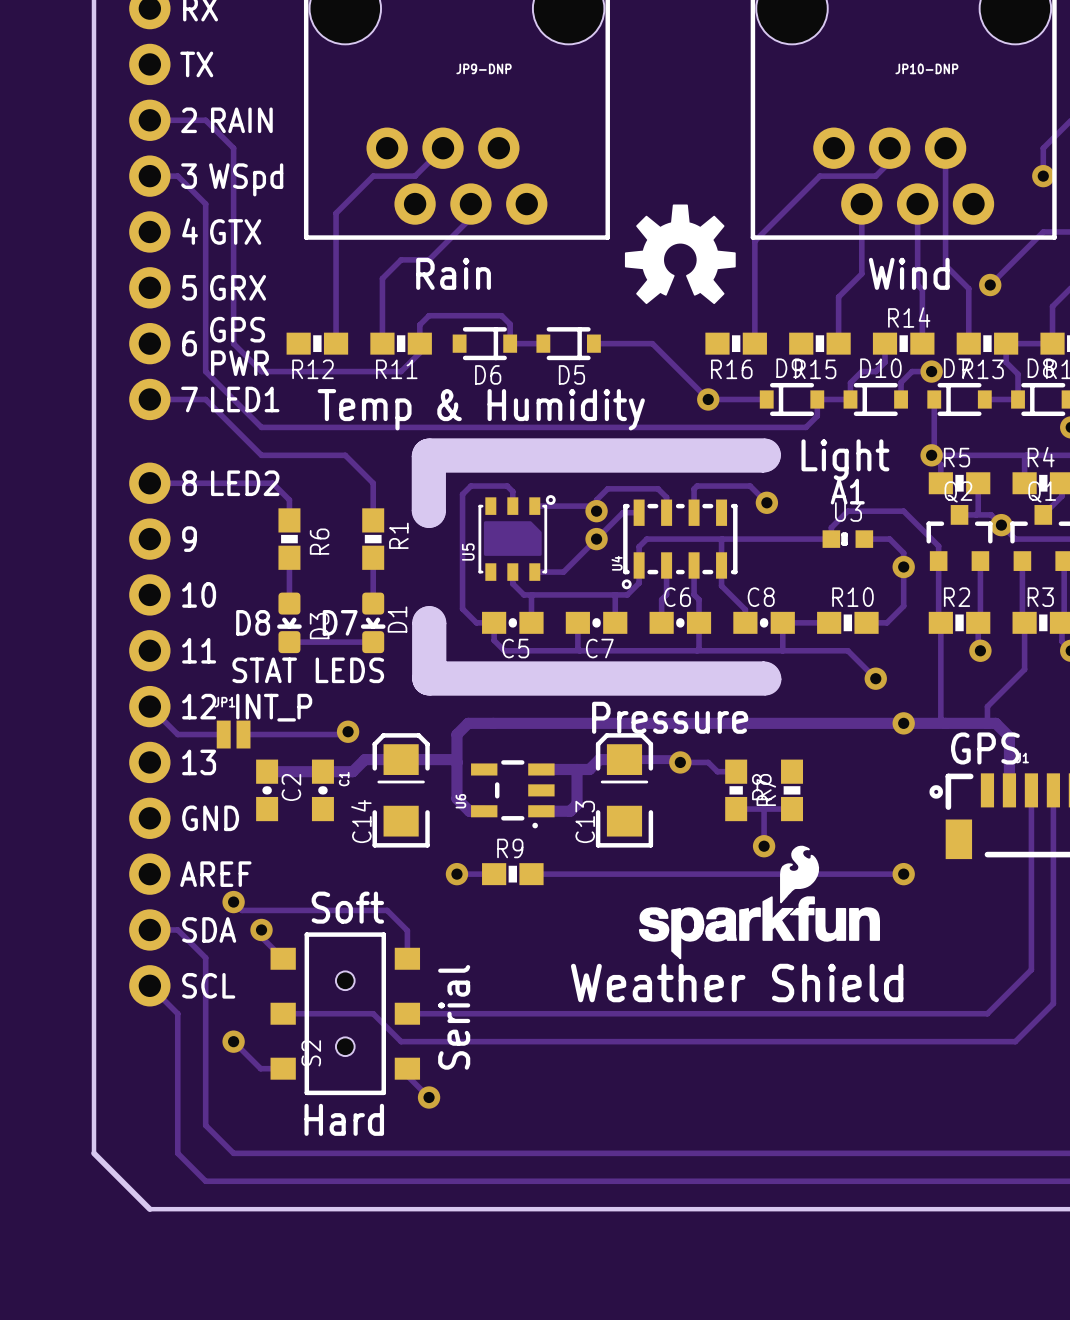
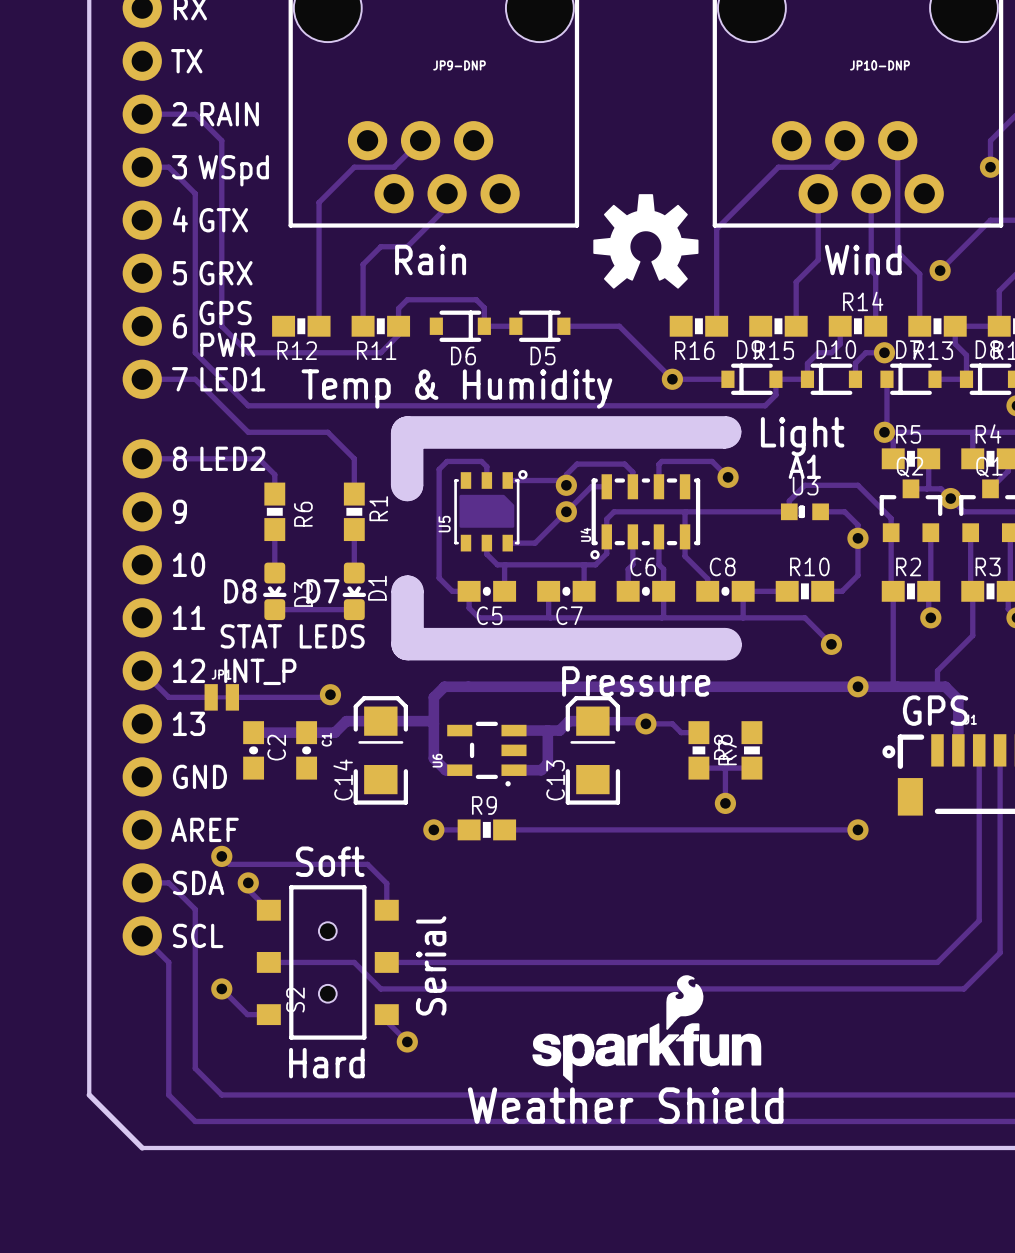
JP1 footprint: [216, 720, 251, 749] -> [204, 684, 240, 711]
drawing position: (759, 902) -> (646, 1029)
text position: Weather Shield (737, 983) -> Weather Shield (625, 1105)

